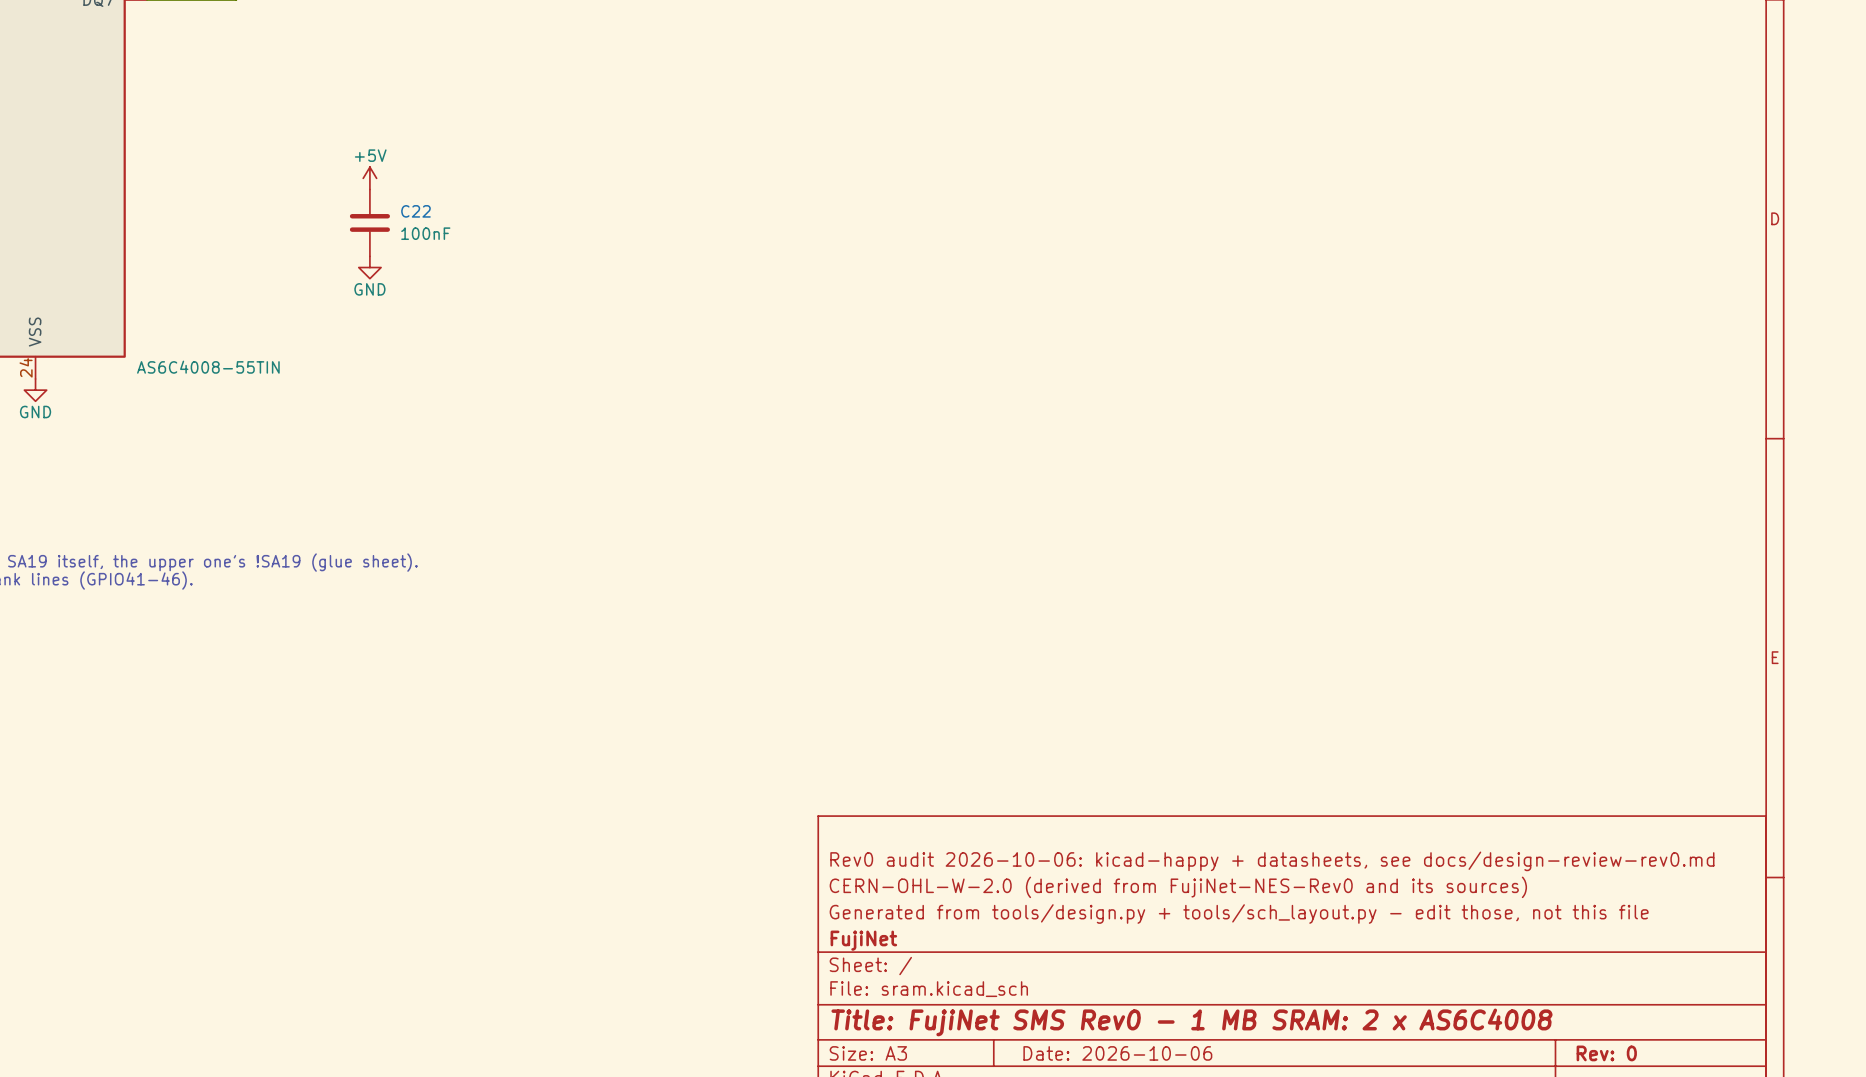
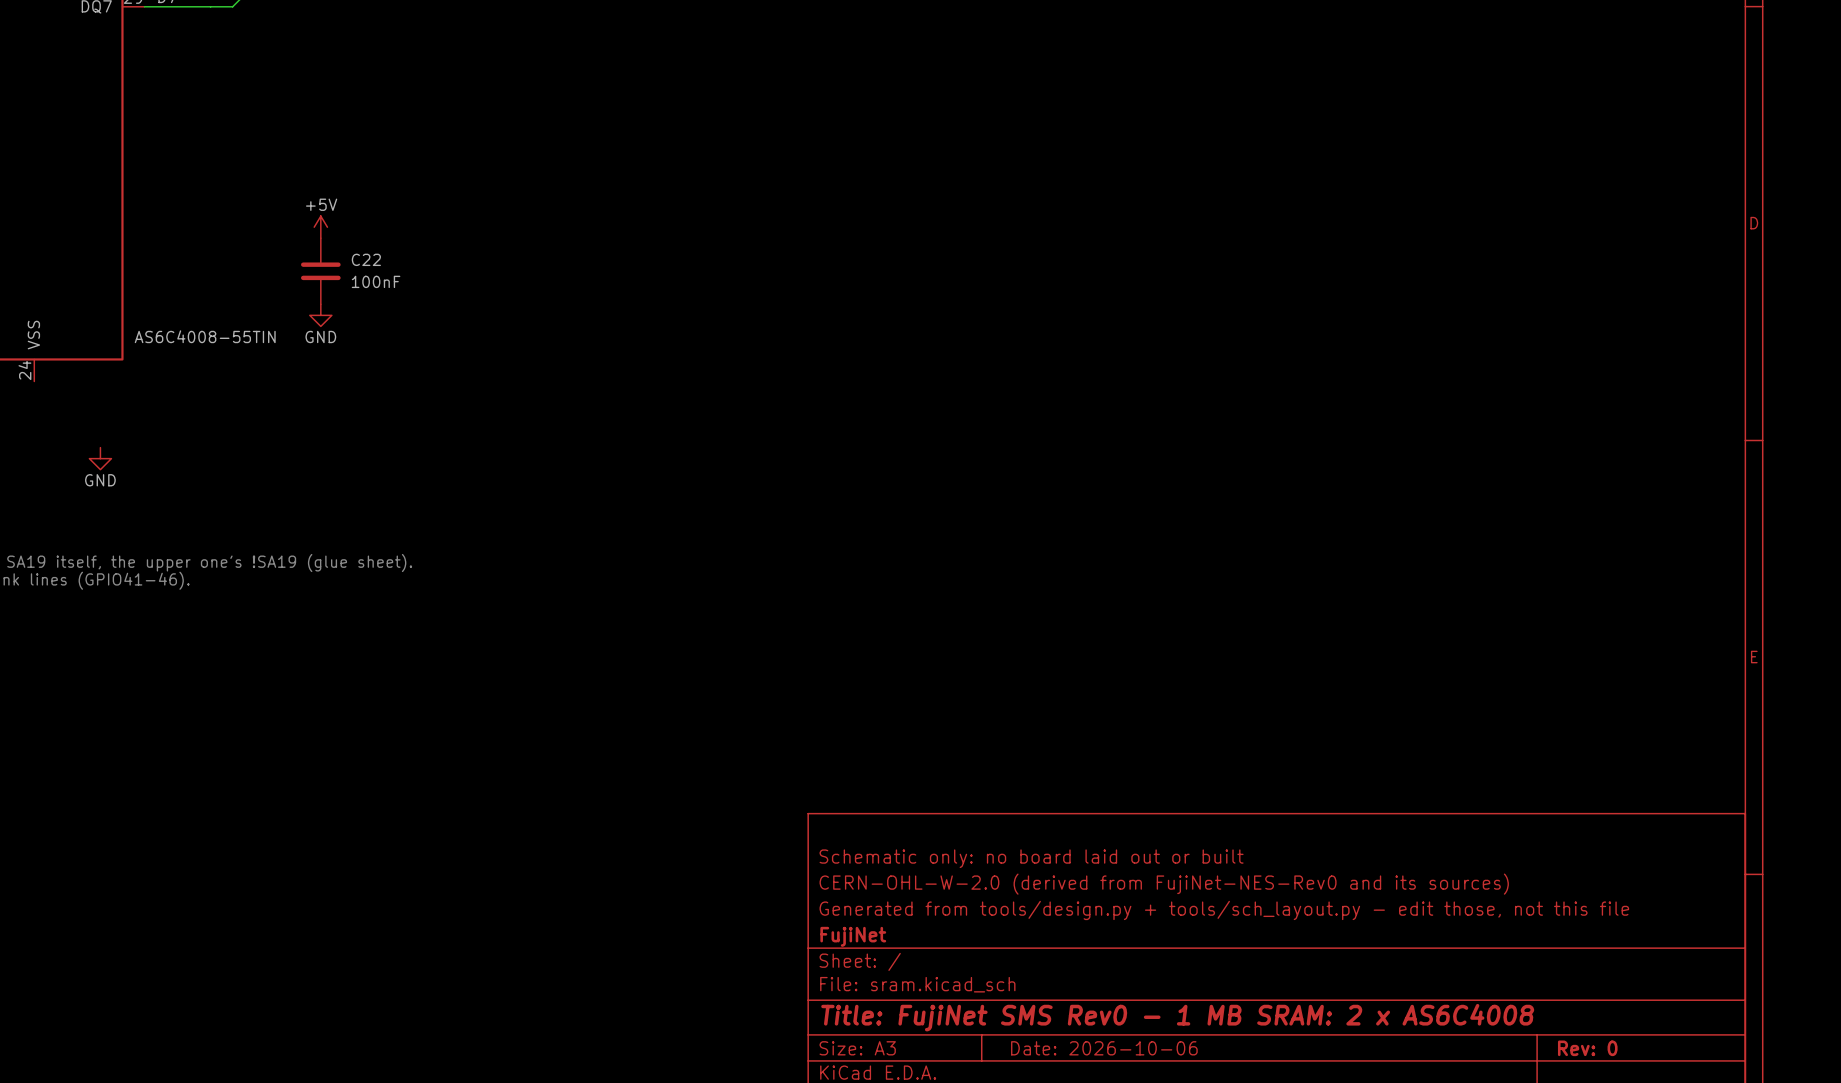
power symbol position: +5V (369, 178) -> +5V (320, 227)
C22 position: (369, 222) -> (320, 271)
power symbol position: GND (369, 267) -> GND (320, 315)
part value position: AS6C4008-55TIN (208, 367) -> AS6C4008-55TIN (205, 336)
power symbol position: GND (35, 390) -> GND (100, 458)
title block: Rev0 audit 2026-10-06: kicad-happy + datasheets, see docs/design-review-rev0.md (1272, 861) -> Schematic only: no board laid out or built (1031, 858)

